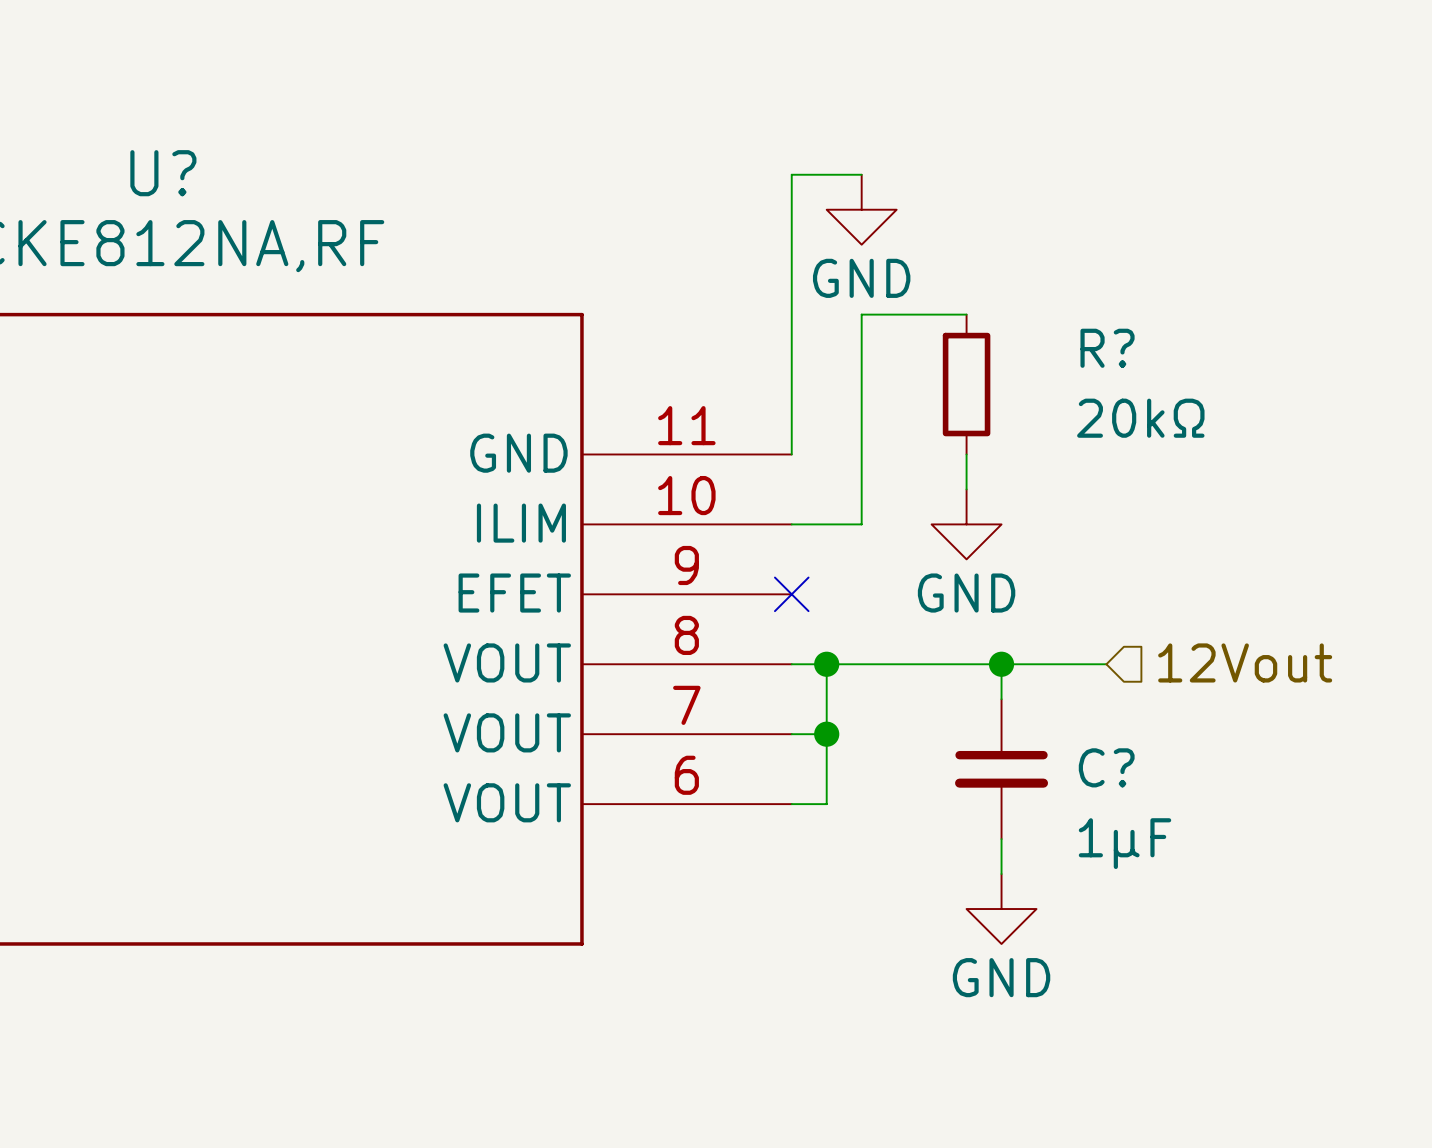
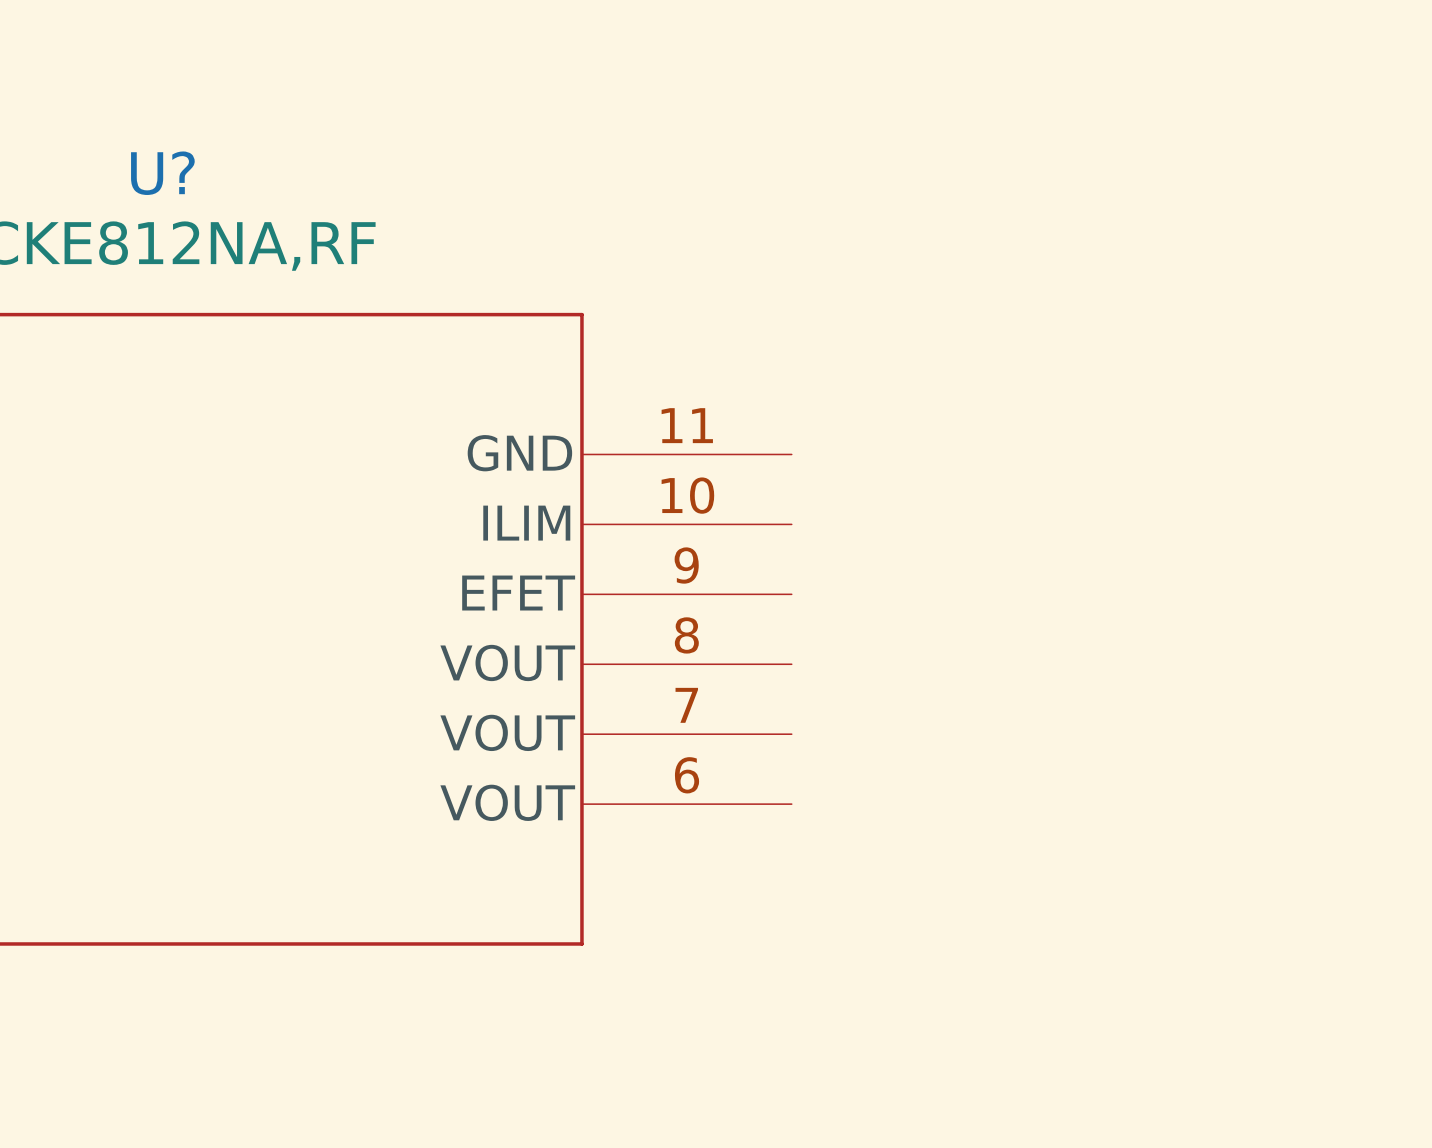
wire: (861, 174) (791, 174) (791, 454) -> none
power symbol: GND (861, 209) -> none
wire: (966, 314) (861, 314) (861, 524) (791, 524) -> none
R?: 20kΩ (966, 384) -> none
wire: (966, 454) (966, 489) -> none
power symbol: GND (966, 524) -> none
no-connect mark: (791, 594) -> none
hierarchical label: 12Vout (1245, 662) -> none
wire: (791, 664) (1106, 664) -> none
wire: (826, 664) (826, 804) (791, 804) -> none
junction: (826, 664) -> none
wire: (1001, 664) (1001, 699) -> none
junction: (1001, 664) -> none
wire: (791, 734) (826, 734) -> none
junction: (826, 734) -> none
C?: 1μF (1001, 769) -> none
wire: (1001, 839) (1001, 874) -> none
power symbol: GND (1001, 909) -> none

